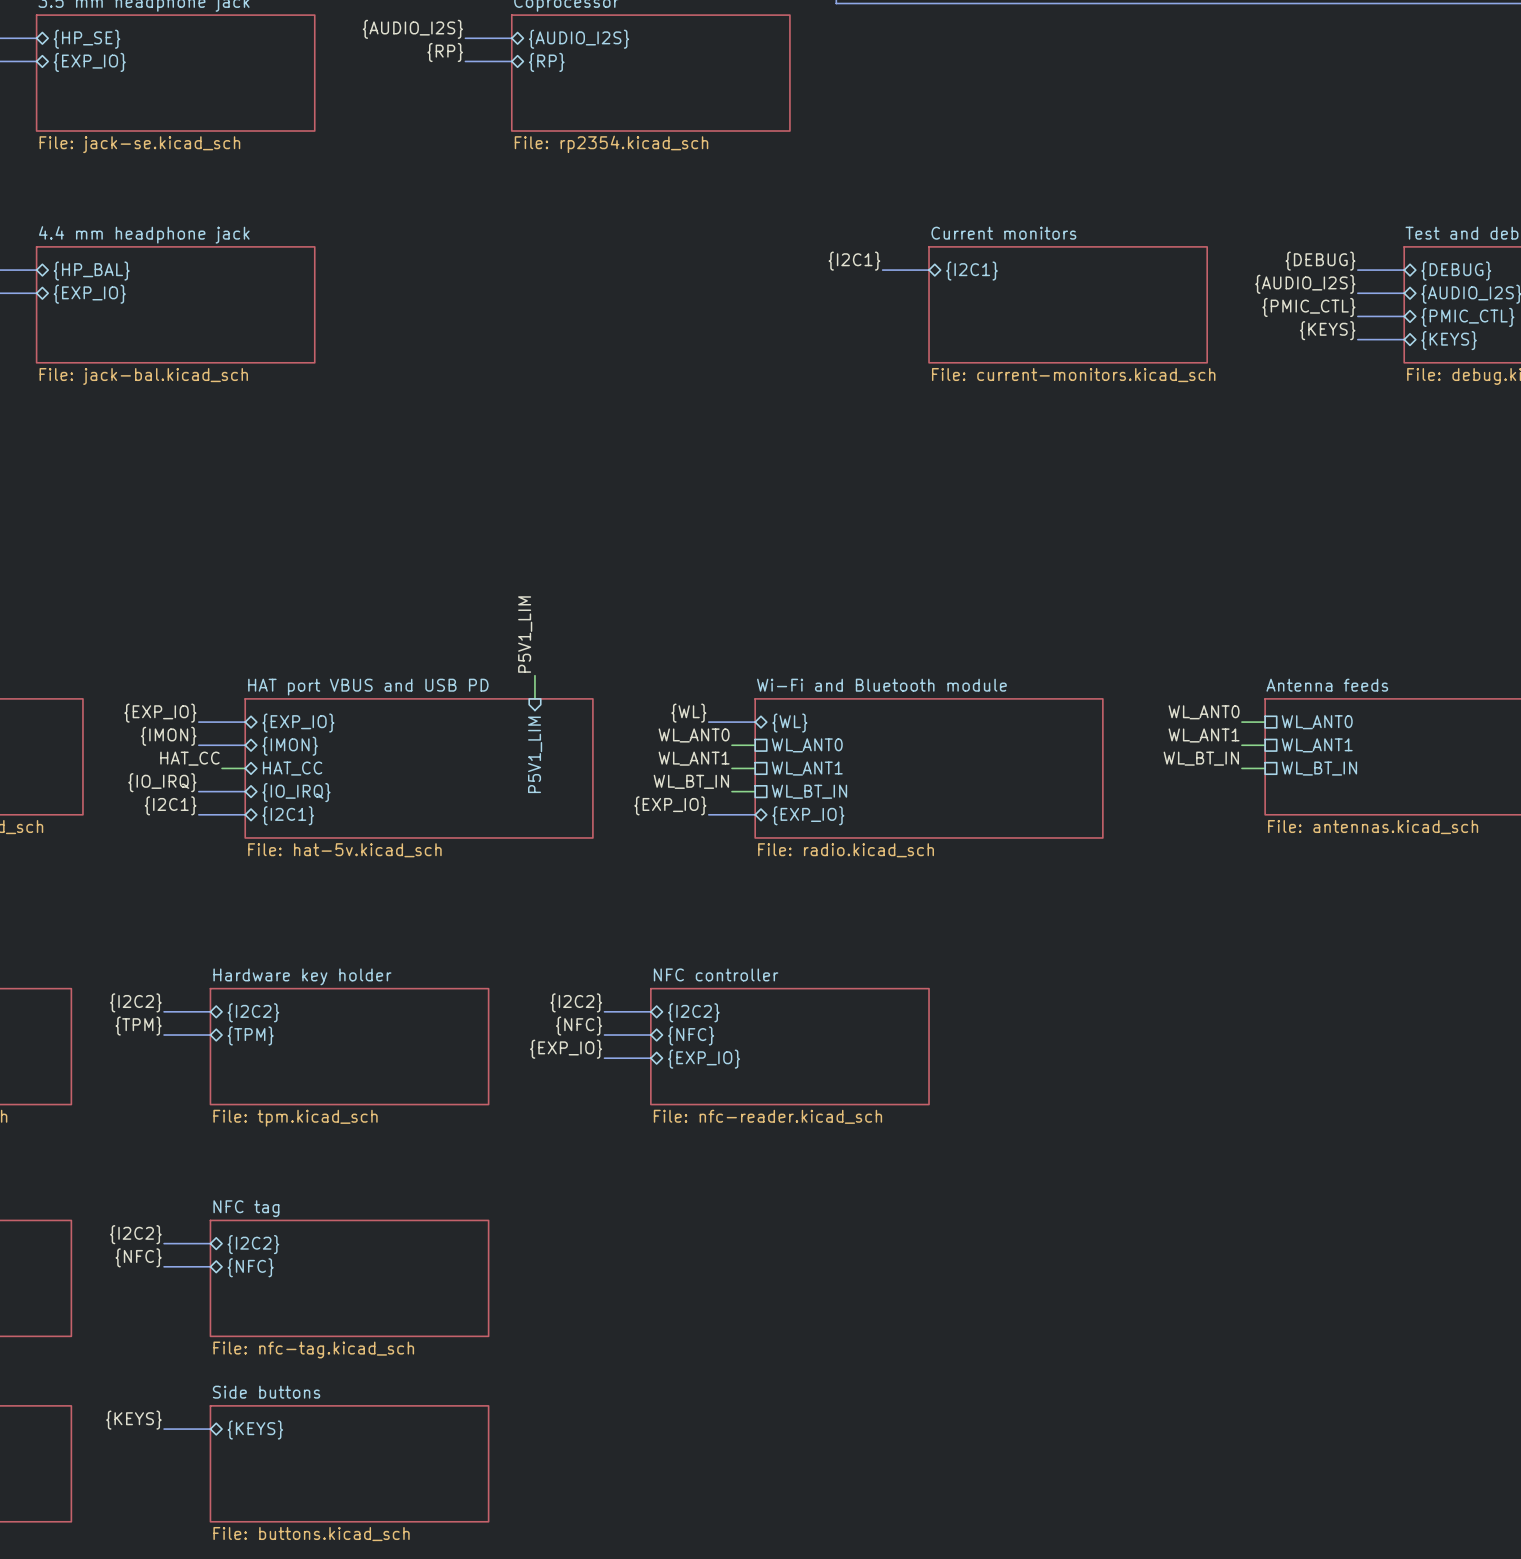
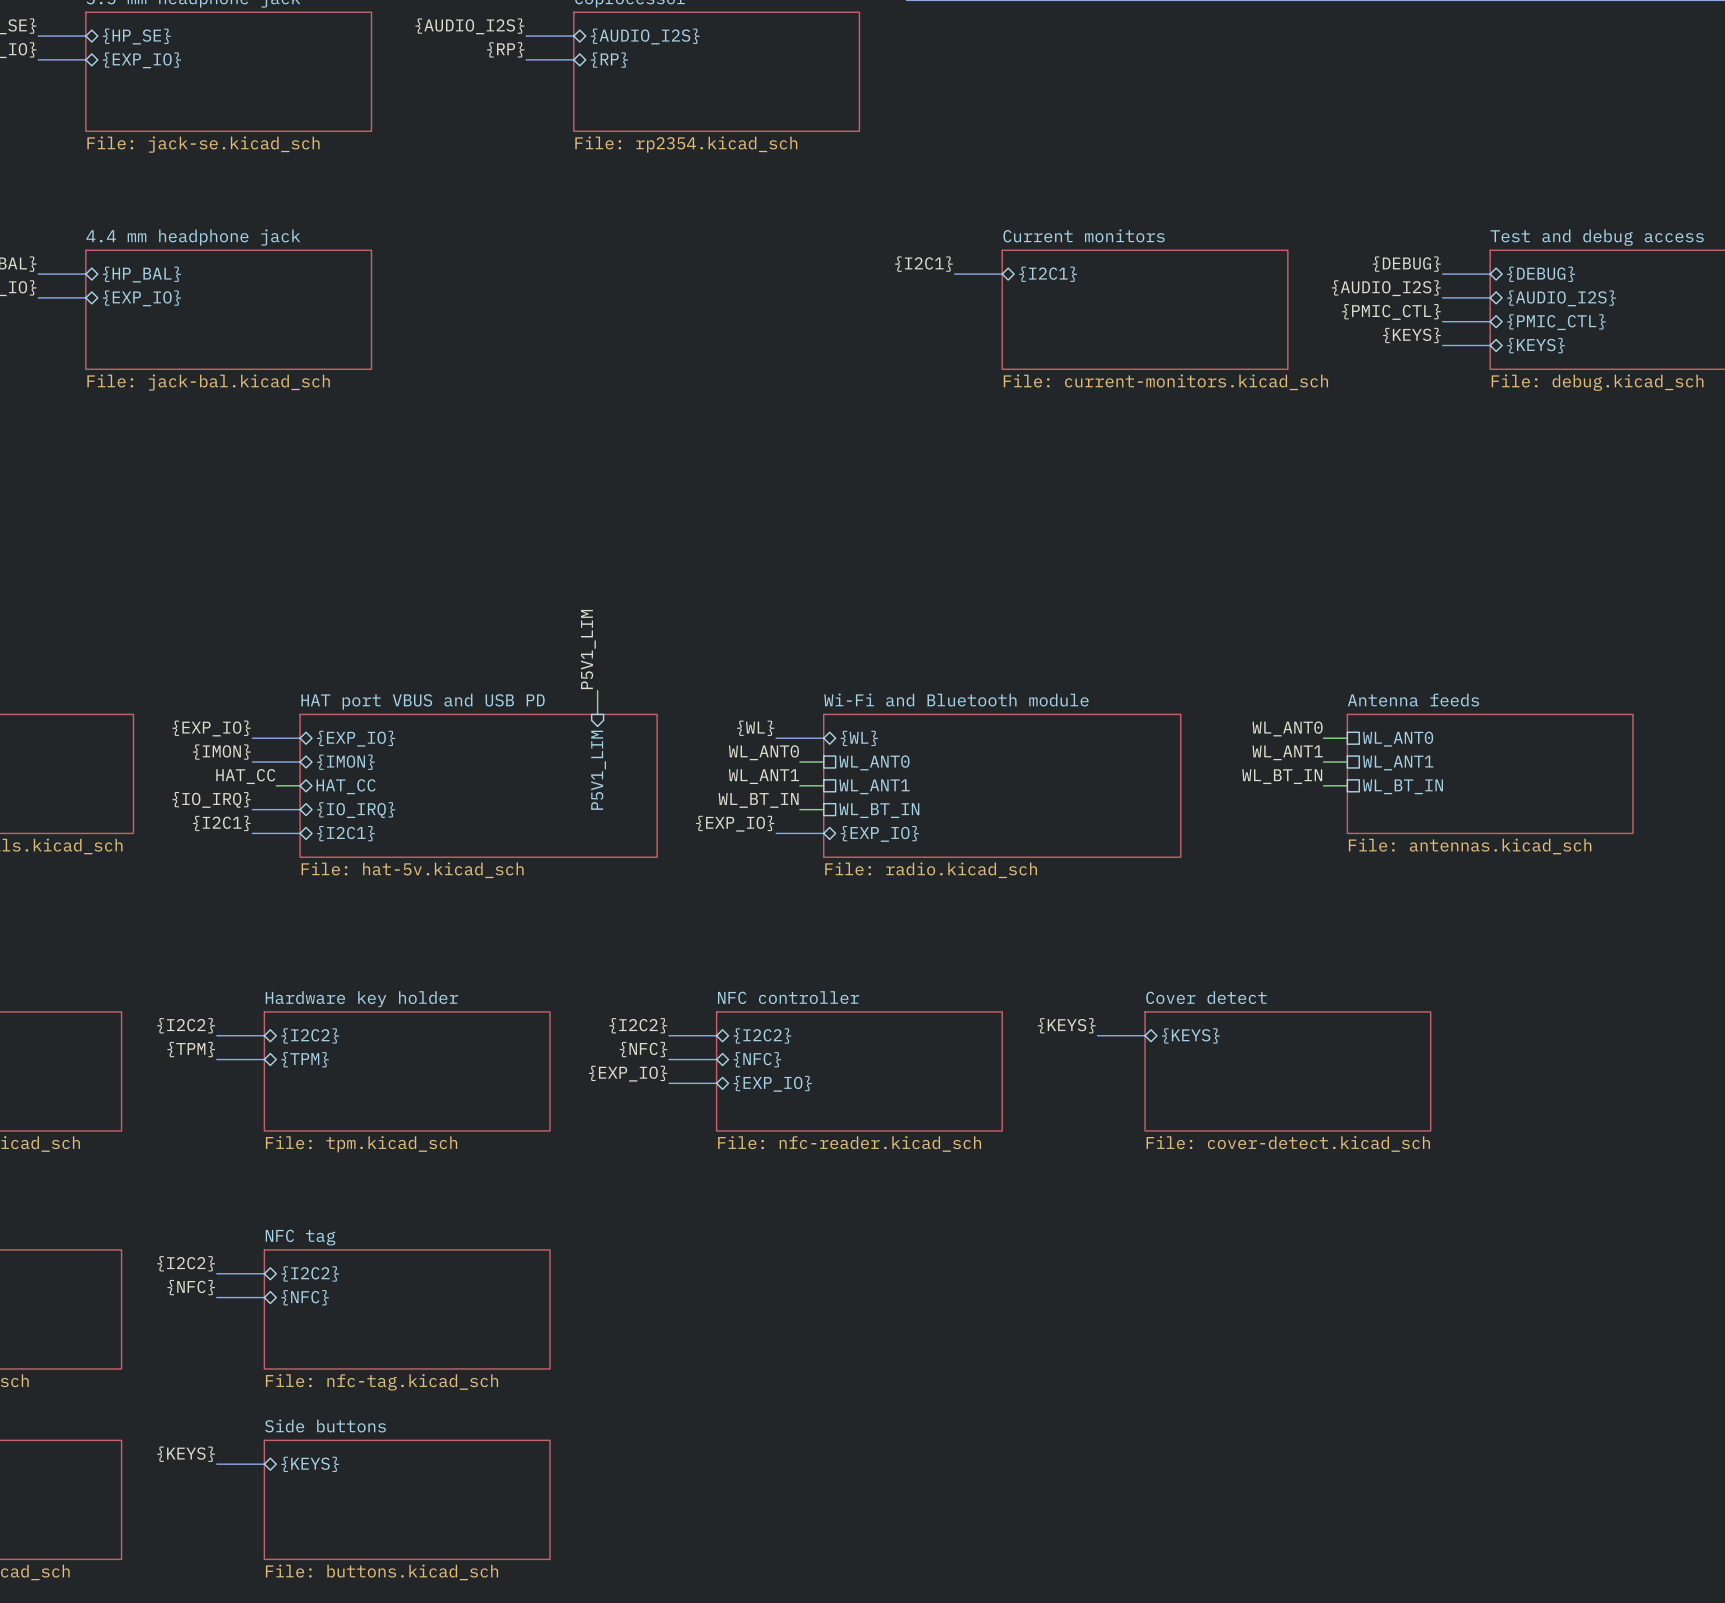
label: none -> {KEYS} (1066, 1025)
bus: none -> (1097, 1035) (1145, 1035)
sheet pin: none -> {KEYS} (1190, 1035)
sheet Cover detect: none -> File: cover-detect.kicad_sch (1287, 1071)

